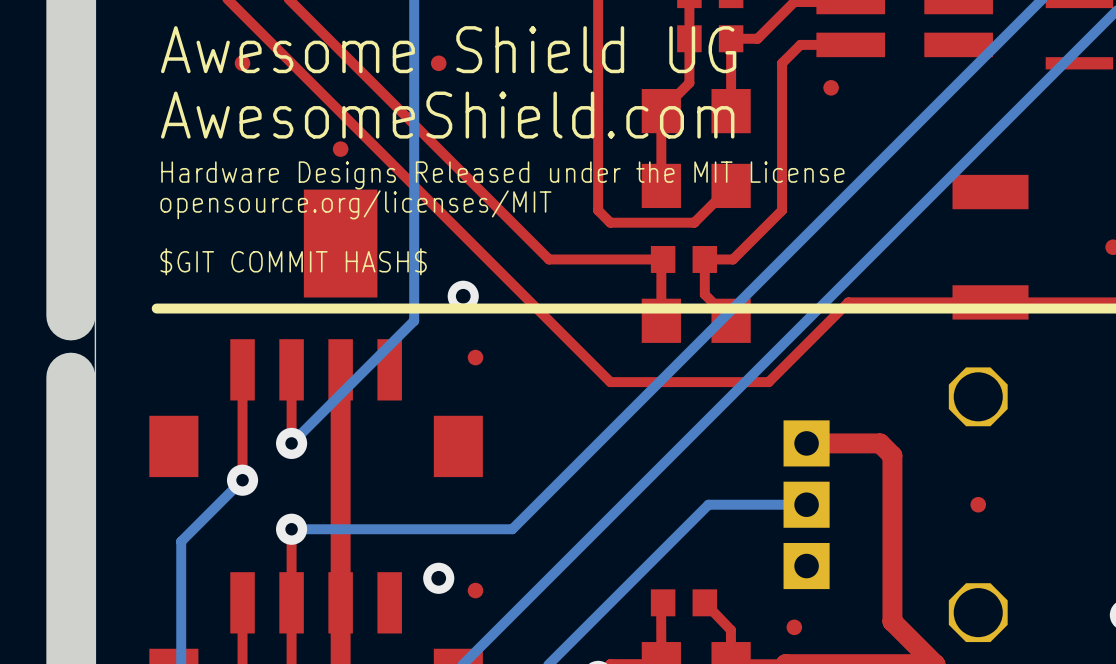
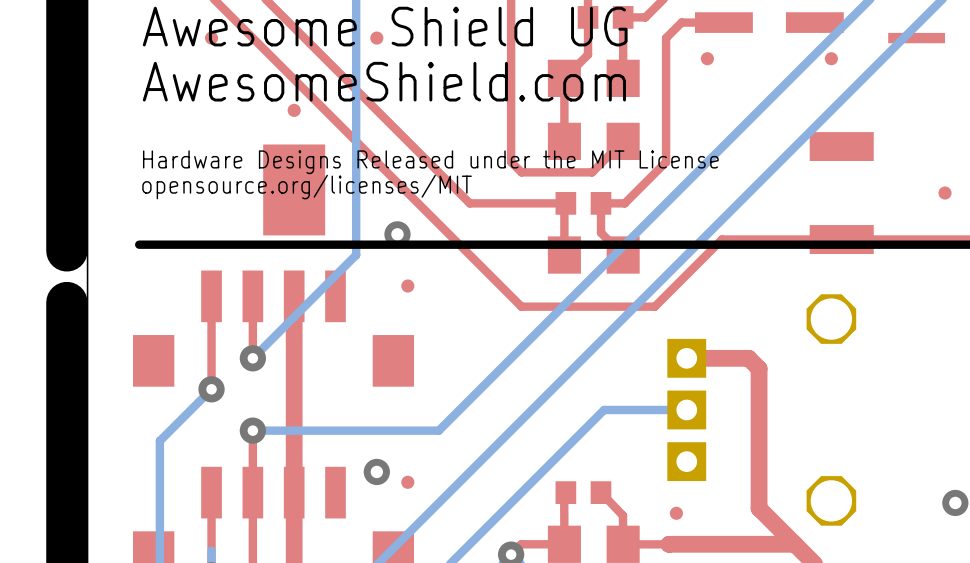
text: Hardware Designs Released under the MIT License (502, 175) -> none
text: opensource.org/licenses/MIT (355, 204) -> Hardware Designs Released under the MIT License (430, 162)
text: none -> opensource.org/licenses/MIT (307, 187)
text: $GIT COMMIT HASH$ (293, 261) -> none
part position: (978, 504) -> (831, 58)

